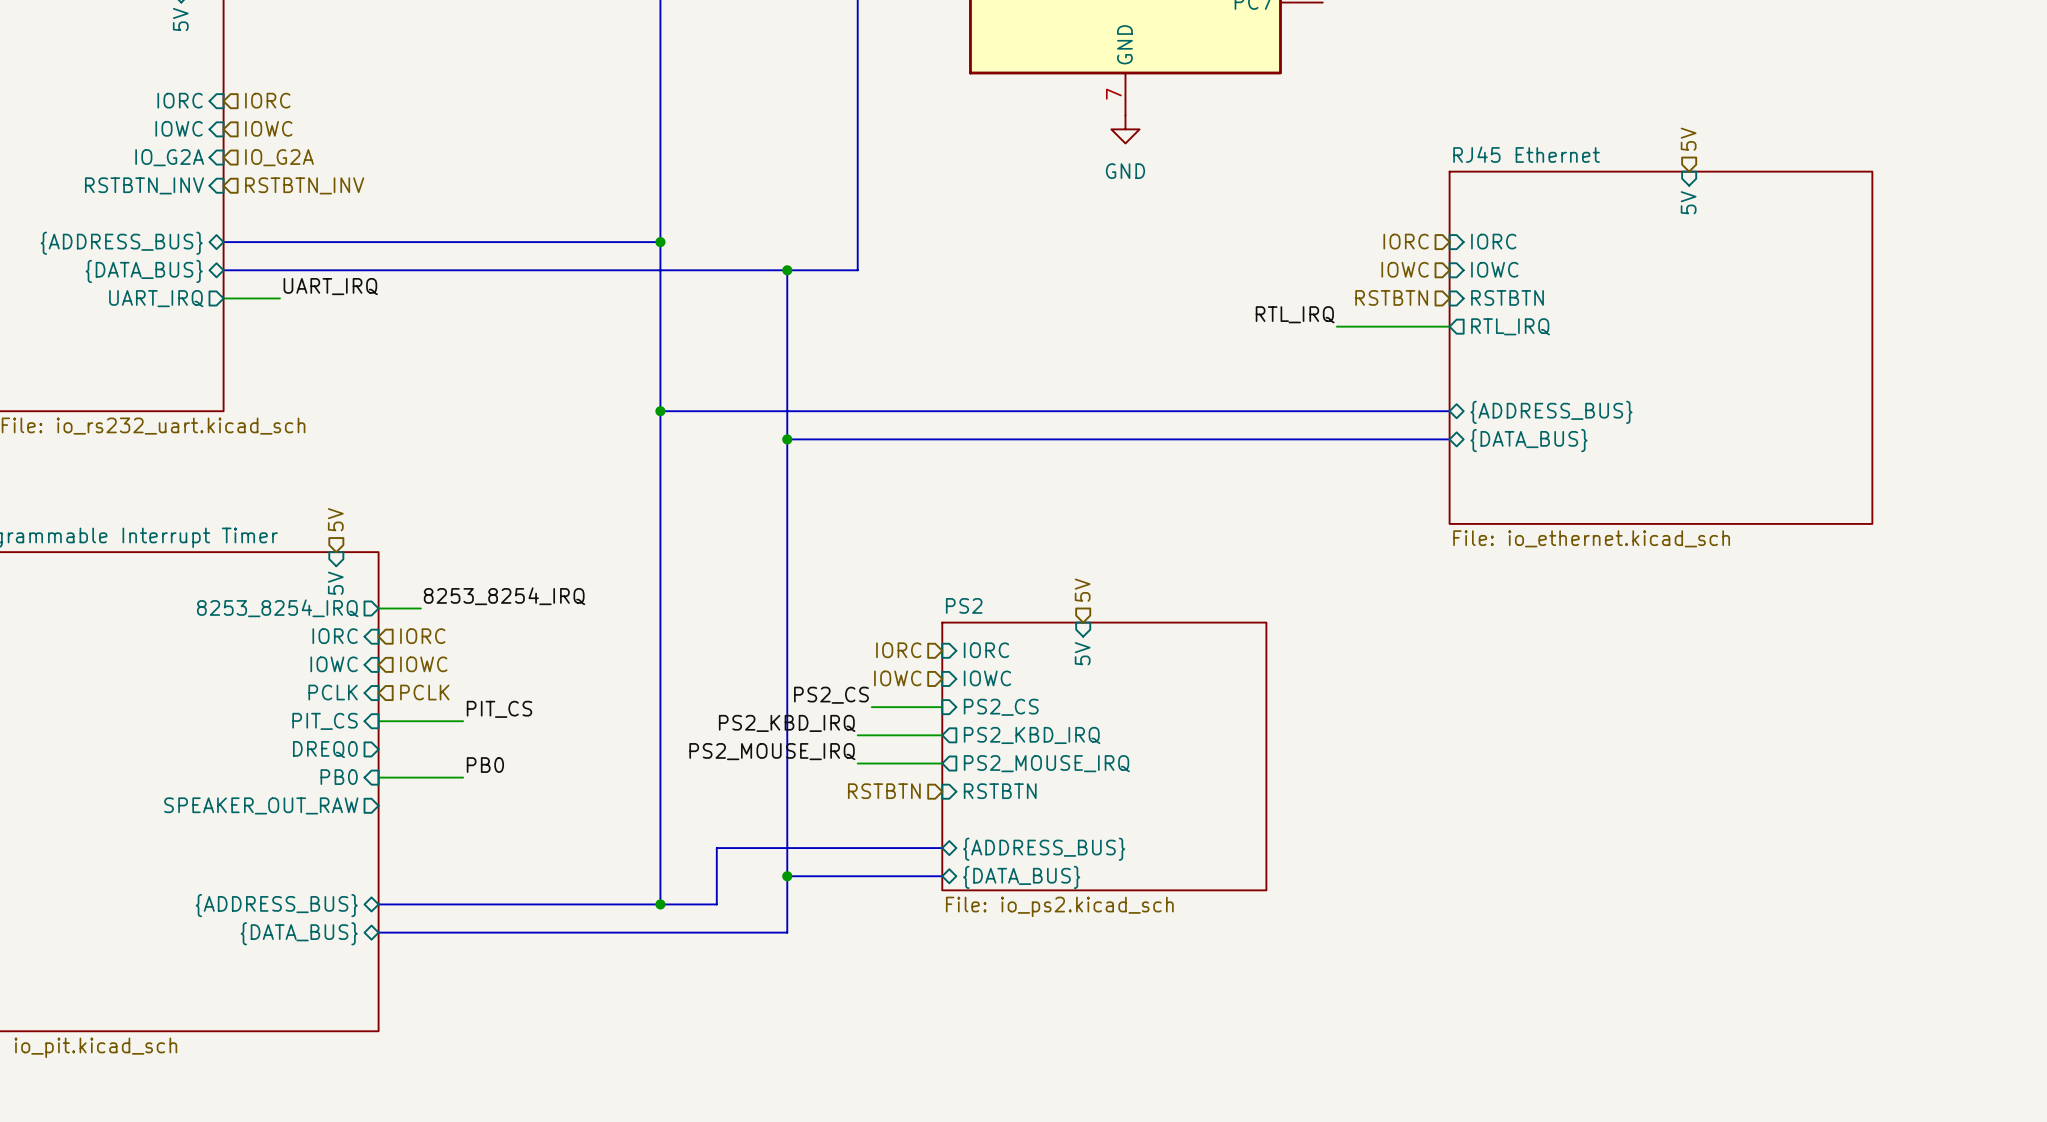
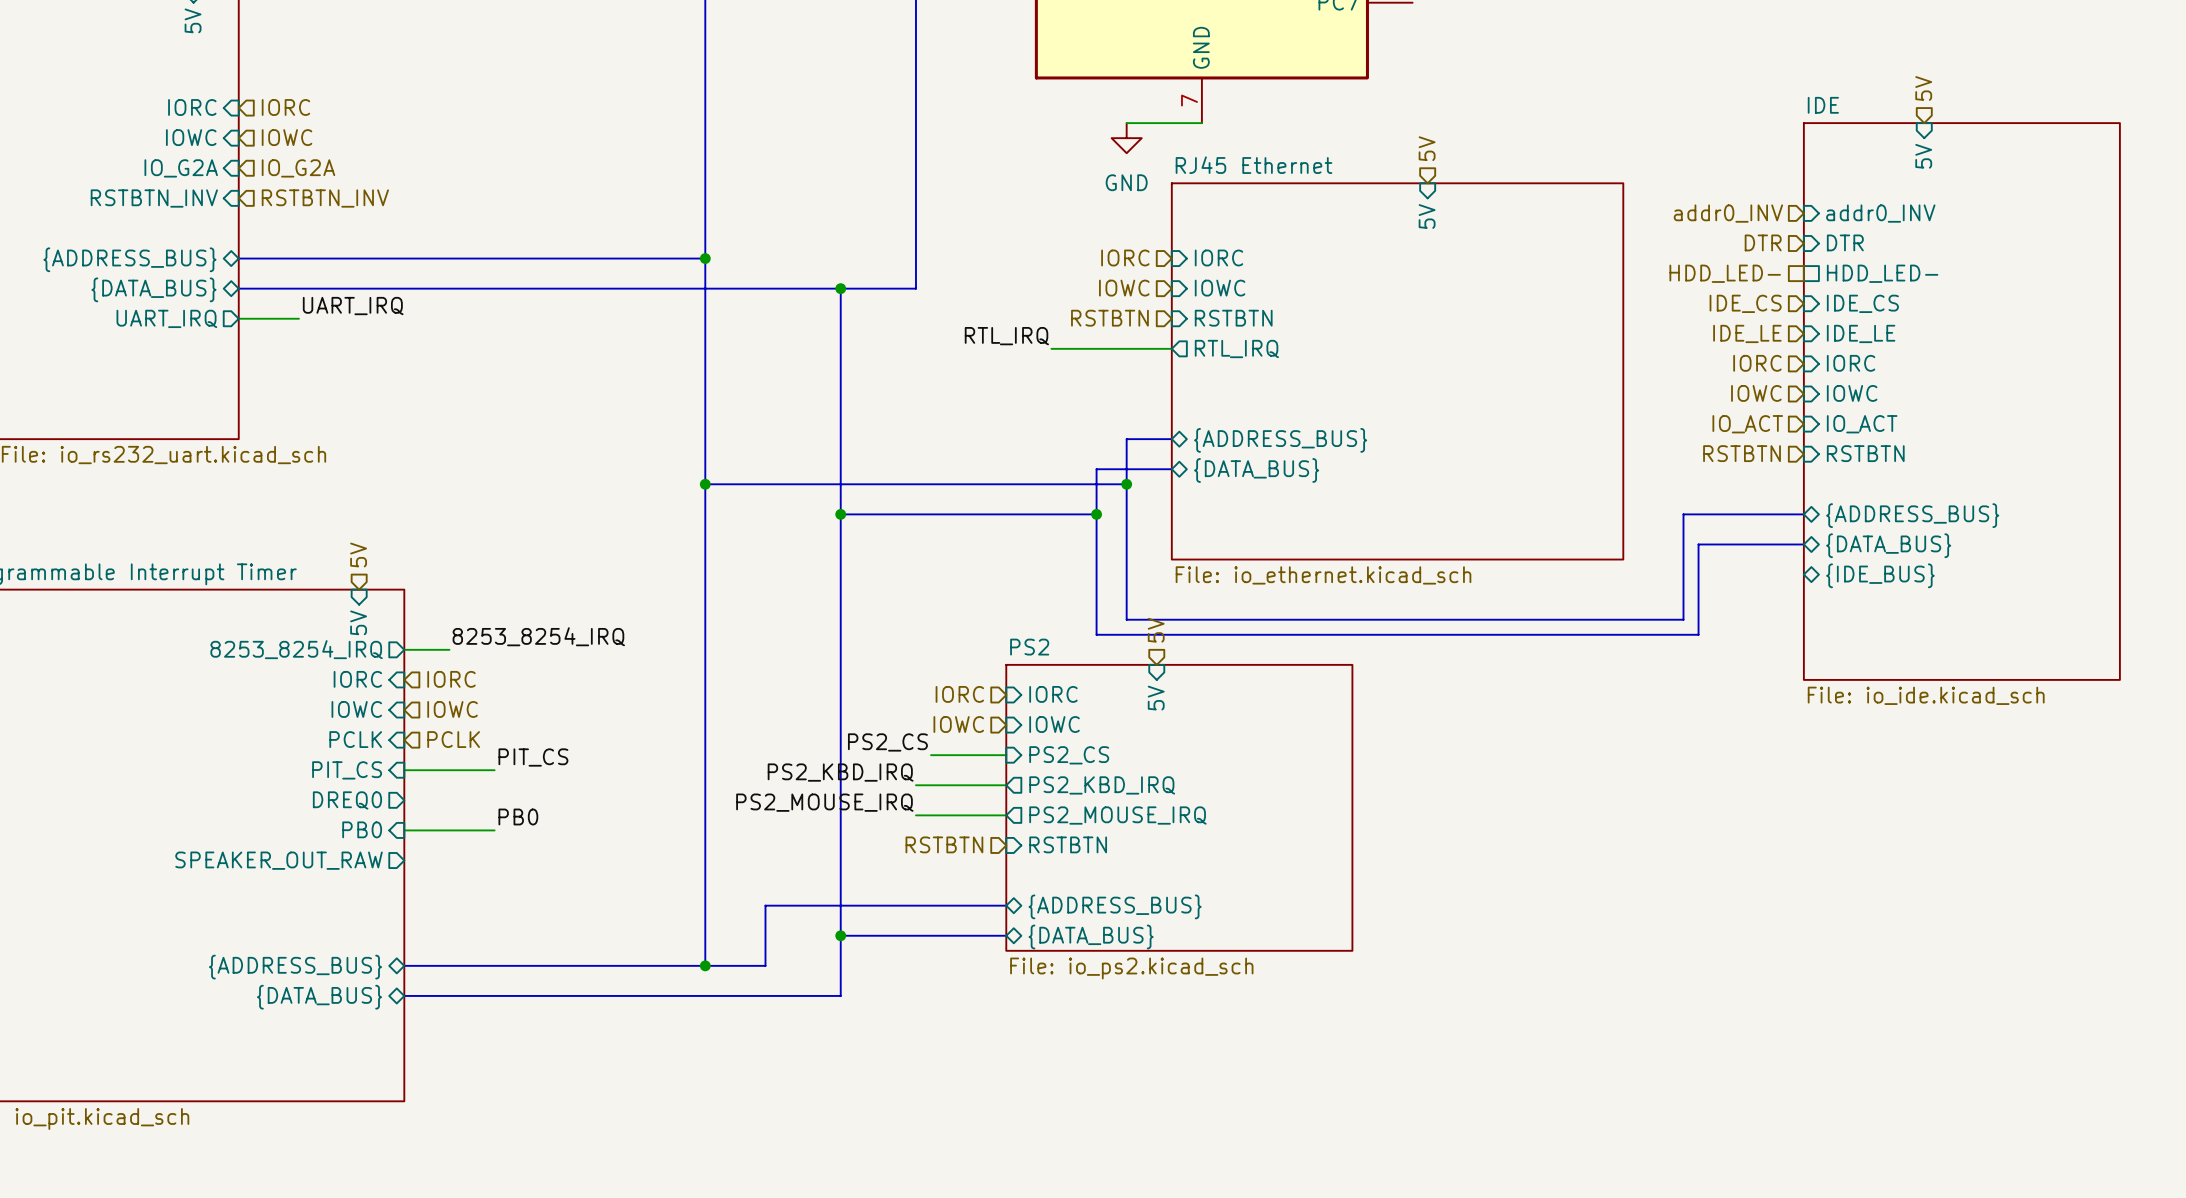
wire: none -> (1126, 123) (1201, 123)
power symbol position: GND (1125, 129) -> GND (1126, 138)
hierarchical label: none -> 5V (1427, 148)
hierarchical label position: 5V (1688, 139) -> 5V (1923, 88)
hierarchical label: none -> addr0_INV (1728, 213)
sheet pin: none -> addr0_INV (1880, 213)
sheet pin: none -> 5V (1427, 216)
sheet pin position: 5V (1688, 202) -> 5V (1923, 156)
hierarchical label: none -> DTR (1763, 242)
sheet pin: none -> DTR (1845, 242)
hierarchical label: none -> IORC (1125, 257)
sheet pin: none -> IORC (1218, 257)
hierarchical label: IORC (1406, 241) -> none
sheet pin: IORC (1493, 241) -> none
hierarchical label: none -> HDD_LED- (1725, 273)
sheet pin: none -> HDD_LED- (1882, 273)
hierarchical label: none -> IOWC (1124, 288)
sheet pin: none -> IOWC (1220, 288)
hierarchical label: IOWC (1405, 269) -> none
sheet pin: IOWC (1494, 269) -> none
hierarchical label: none -> IDE_CS (1745, 303)
sheet pin: none -> IDE_CS (1862, 303)
hierarchical label: none -> RSTBTN (1109, 318)
sheet pin: none -> RSTBTN (1233, 318)
hierarchical label: RSTBTN (1391, 297) -> none
sheet pin: RSTBTN (1507, 297) -> none
hierarchical label: none -> IDE_LE (1747, 333)
sheet pin: none -> IDE_LE (1861, 333)
label: none -> RTL_IRQ (1006, 336)
label: RTL_IRQ (1295, 314) -> none
wire: none -> (1051, 348) (1171, 348)
sheet pin: none -> RTL_IRQ (1236, 349)
wire: (1336, 326) (1449, 326) -> none
sheet pin: RTL_IRQ (1510, 326) -> none
hierarchical label: none -> IORC (1757, 363)
sheet pin: none -> IORC (1851, 363)
sheet RJ45 Ethernet position: (1660, 347) -> (1397, 371)
hierarchical label: none -> IOWC (1756, 393)
sheet pin: none -> IOWC (1852, 393)
sheet IDE: none -> File: io_ide.kicad_sch (1961, 401)
hierarchical label: none -> IO_ACT (1747, 424)
sheet pin: none -> IO_ACT (1862, 424)
bus: (660, 411) (1055, 411) -> (1803, 514) (1683, 514) (1683, 619) (1126, 619) (1126, 439)
junction position: (660, 411) -> (705, 484)
bus: (1097, 411) (1449, 411) -> none
sheet pin: none -> {ADDRESS_BUS} (1280, 440)
sheet pin: {ADDRESS_BUS} (1551, 412) -> none
hierarchical label: none -> RSTBTN (1742, 453)
sheet pin: none -> RSTBTN (1865, 453)
bus: (787, 439) (1026, 439) -> (1803, 544) (1698, 544) (1698, 634) (1096, 634) (1096, 469)
junction position: (787, 439) -> (840, 514)
bus: (1097, 439) (1449, 439) -> none
sheet pin: none -> {DATA_BUS} (1256, 470)
sheet pin: {DATA_BUS} (1529, 440) -> none
bus: none -> (705, 484) (1126, 484)
junction: none -> (1126, 484)
bus: none -> (840, 514) (1096, 514)
junction: none -> (1096, 514)
sheet pin: none -> {ADDRESS_BUS} (1912, 515)
sheet pin: none -> {DATA_BUS} (1888, 545)
sheet pin: none -> {IDE_BUS} (1880, 575)

